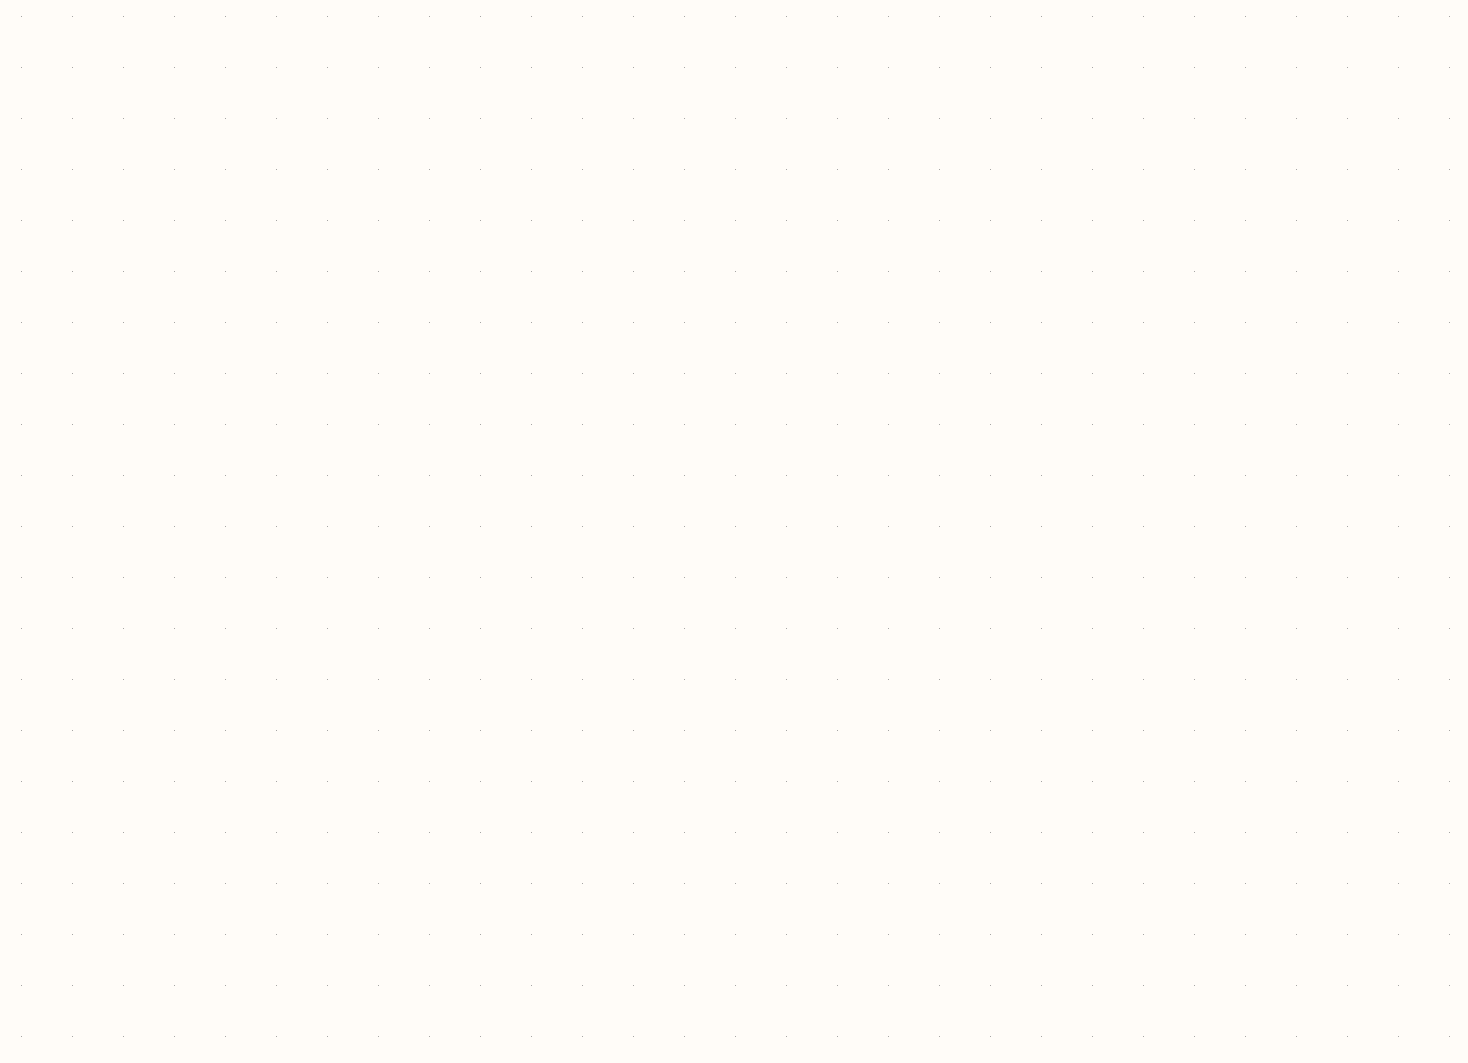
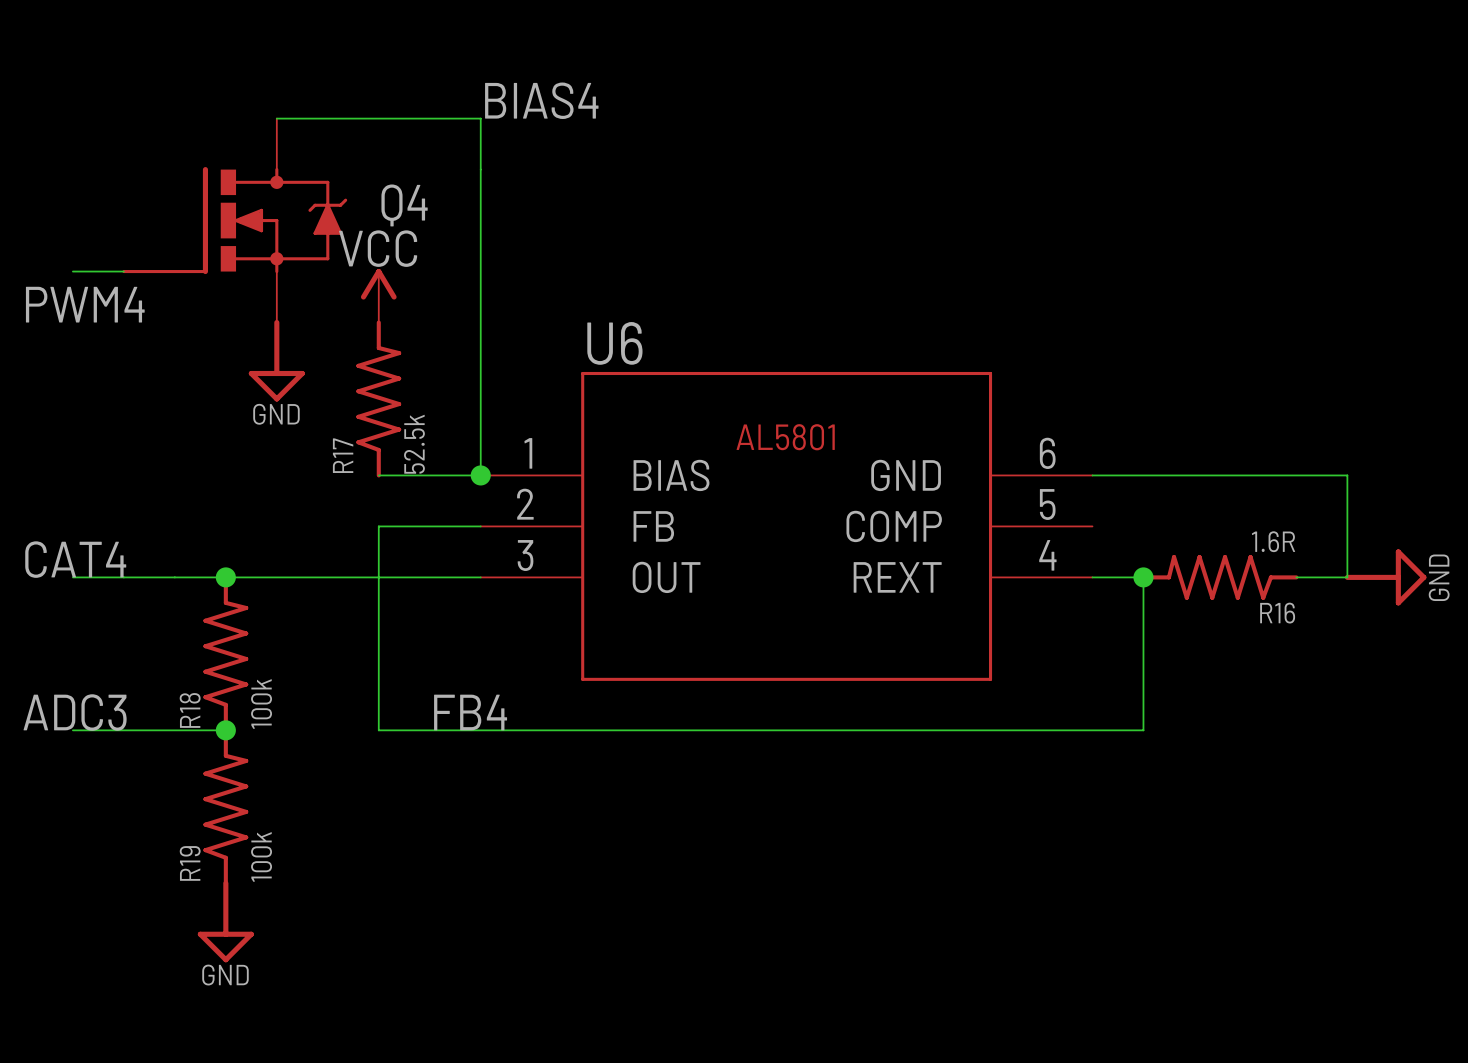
label: none -> BIAS4 (541, 100)
wire: none -> (276, 118) (480, 118) (480, 475) (378, 475)
Q4: none -> (234, 220)
wire: none -> (72, 271) (123, 271)
power symbol: none -> VCC (378, 295)
label: none -> PWM4 (85, 304)
power symbol: none -> GND (276, 360)
R17: none -> 52.5k (378, 398)
junction: none -> (480, 475)
wire: none -> (1092, 475) (1347, 475) (1347, 577) (1296, 577)
wire: none -> (480, 526) (378, 526) (378, 730) (1143, 730) (1143, 577) (1092, 577)
U6: none -> (786, 526)
label: none -> CAT4 (75, 559)
wire: none -> (72, 577) (480, 577)
junction: none -> (225, 577)
junction: none -> (1143, 577)
R16: none -> 1.6R (1219, 577)
power symbol: none -> GND (1385, 577)
R18: none -> 100k (225, 653)
label: none -> FB4 (470, 712)
label: none -> ADC3 (75, 712)
wire: none -> (72, 730) (225, 730)
junction: none -> (225, 730)
R19: none -> 100k (225, 806)
power symbol: none -> GND (225, 921)

